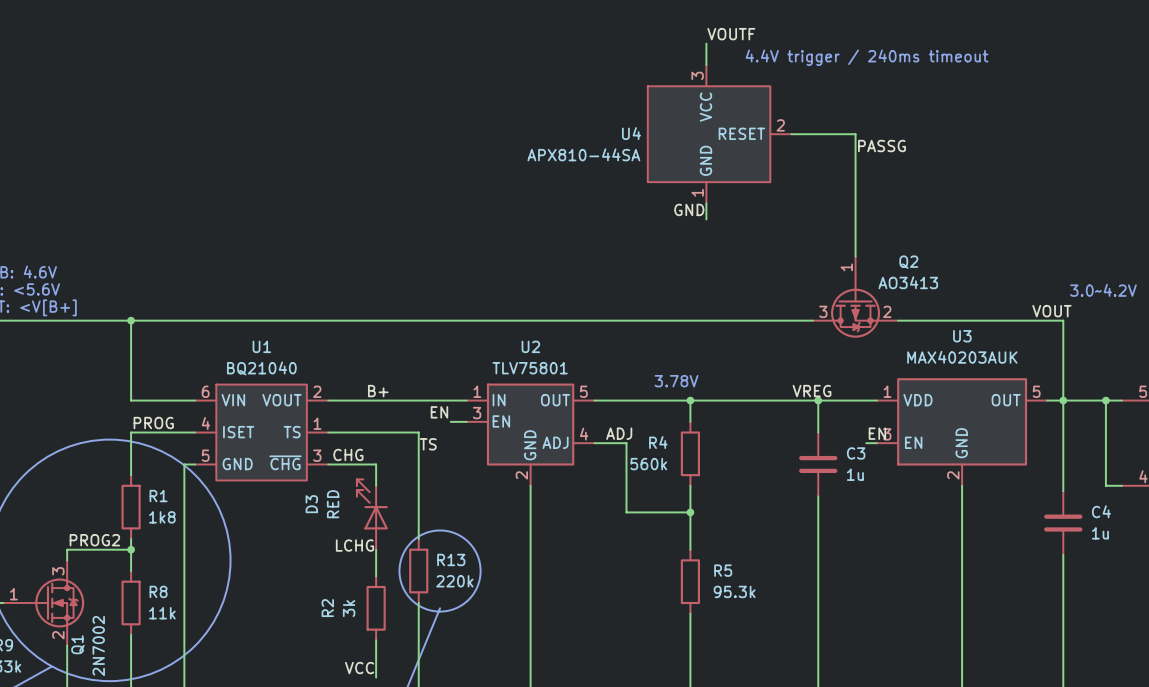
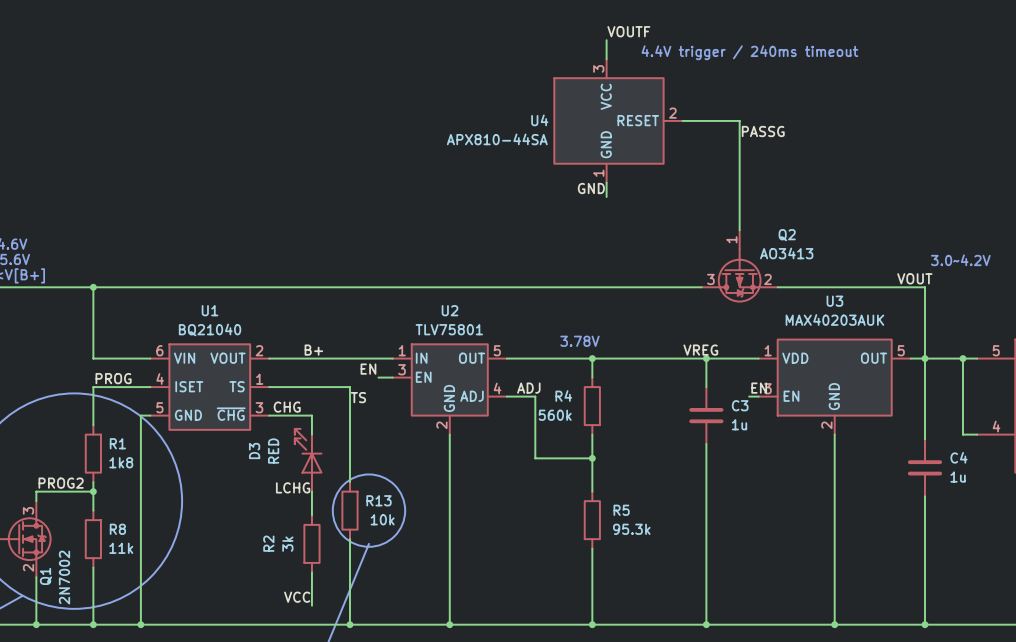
R13 value: 220k (454, 581) -> 10k (382, 519)

